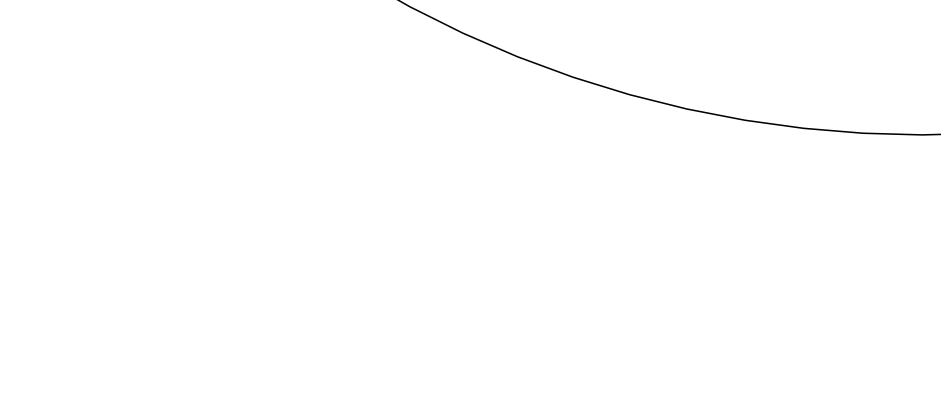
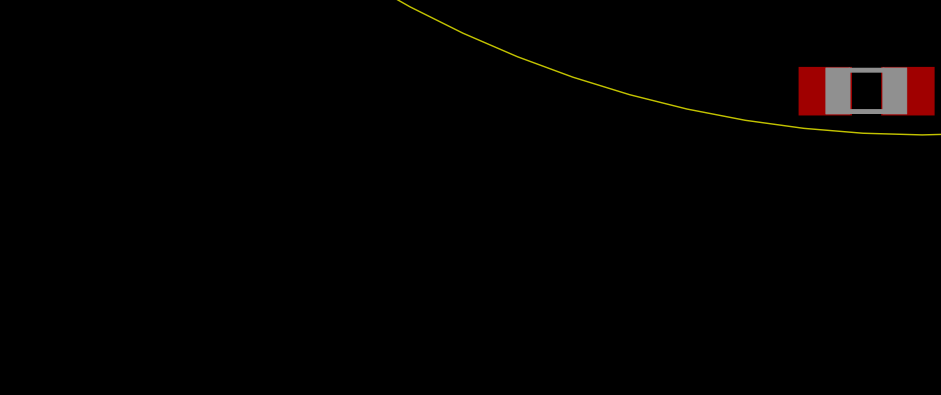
part: none -> (866, 91)

